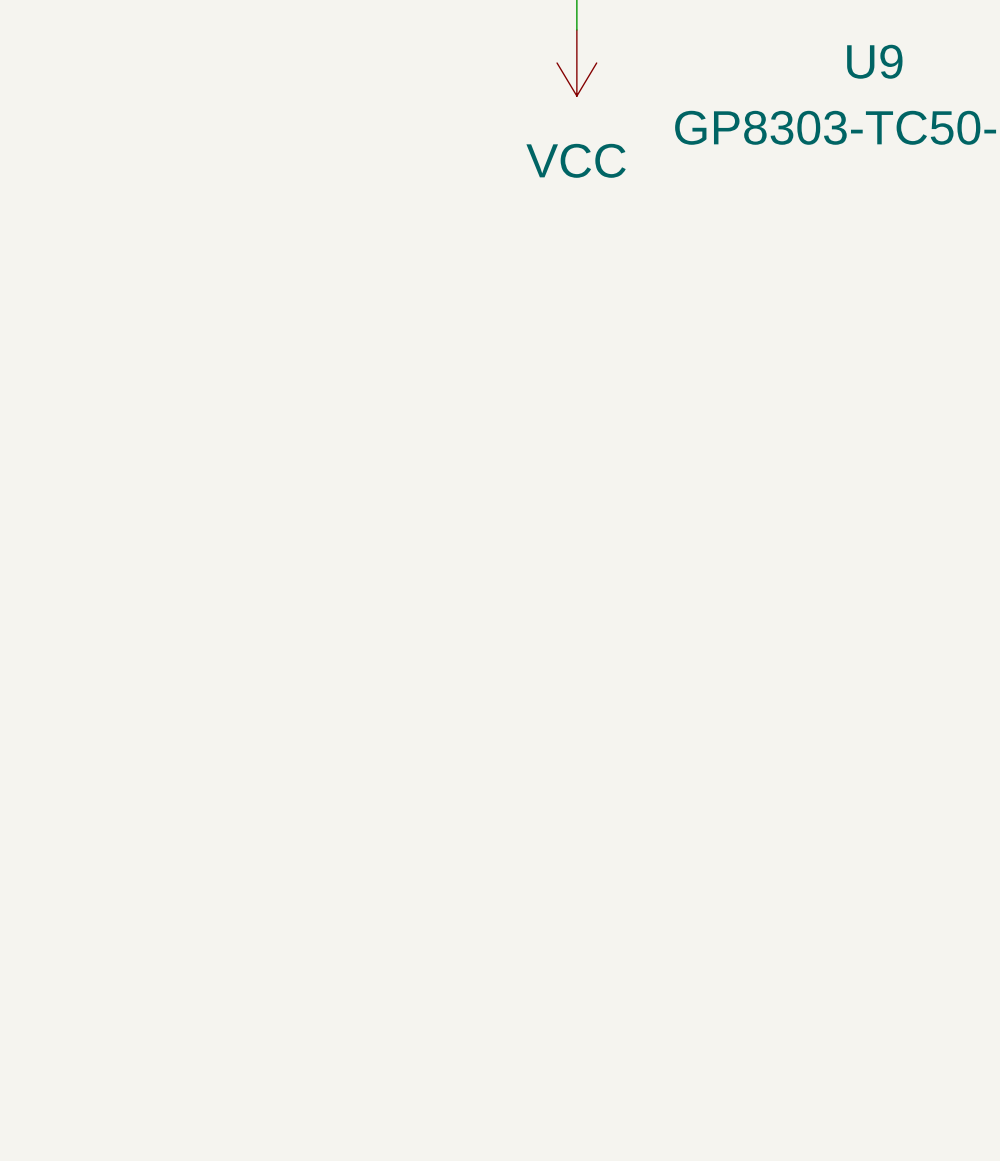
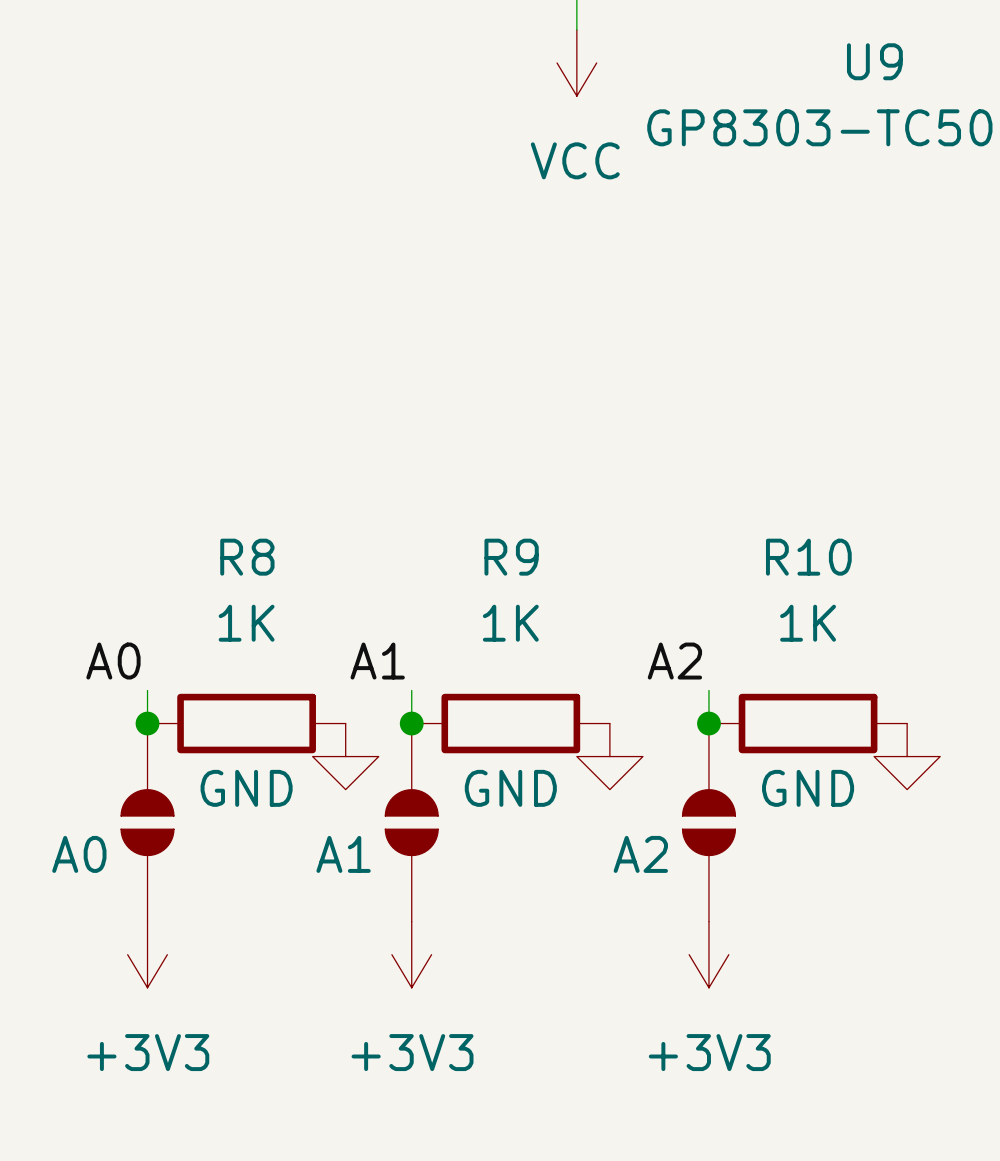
label: none -> A2 (674, 661)
label: none -> A0 (113, 661)
label: none -> A1 (377, 661)
wire: none -> (147, 690) (147, 723)
wire: none -> (411, 690) (411, 723)
wire: none -> (708, 690) (708, 723)
junction: none -> (147, 723)
R8: none -> 1K (246, 723)
junction: none -> (411, 723)
R9: none -> 1K (510, 723)
junction: none -> (708, 723)
R10: none -> 1K (808, 723)
power symbol: none -> GND (345, 756)
power symbol: none -> GND (609, 756)
power symbol: none -> GND (907, 756)
part: none -> A0 (147, 822)
part: none -> A1 (411, 822)
part: none -> A2 (708, 822)
power symbol: none -> +3V3 (147, 954)
power symbol: none -> +3V3 (411, 954)
power symbol: none -> +3V3 (708, 954)

